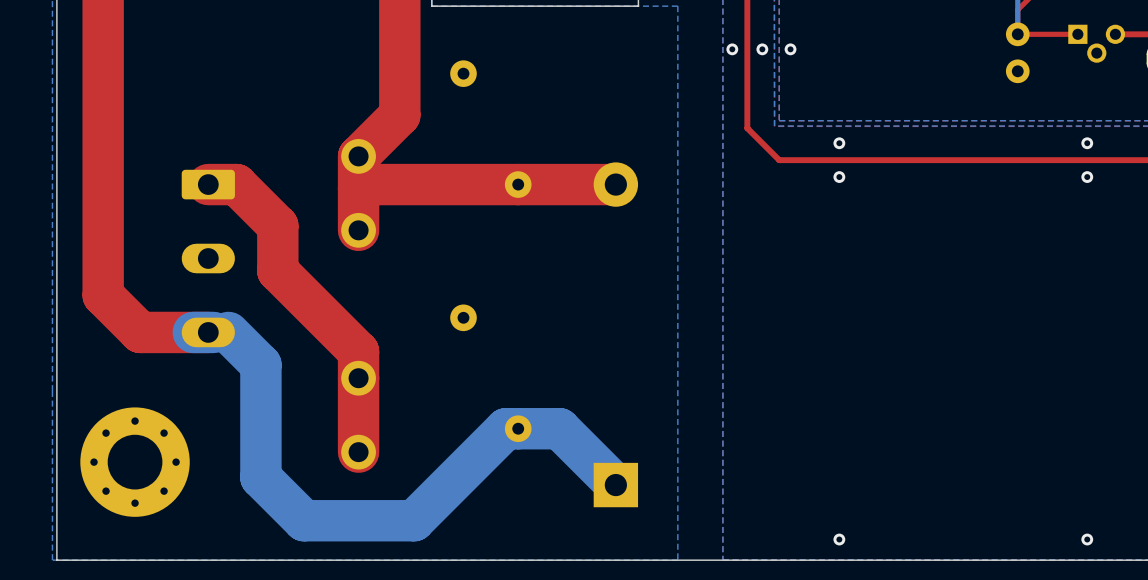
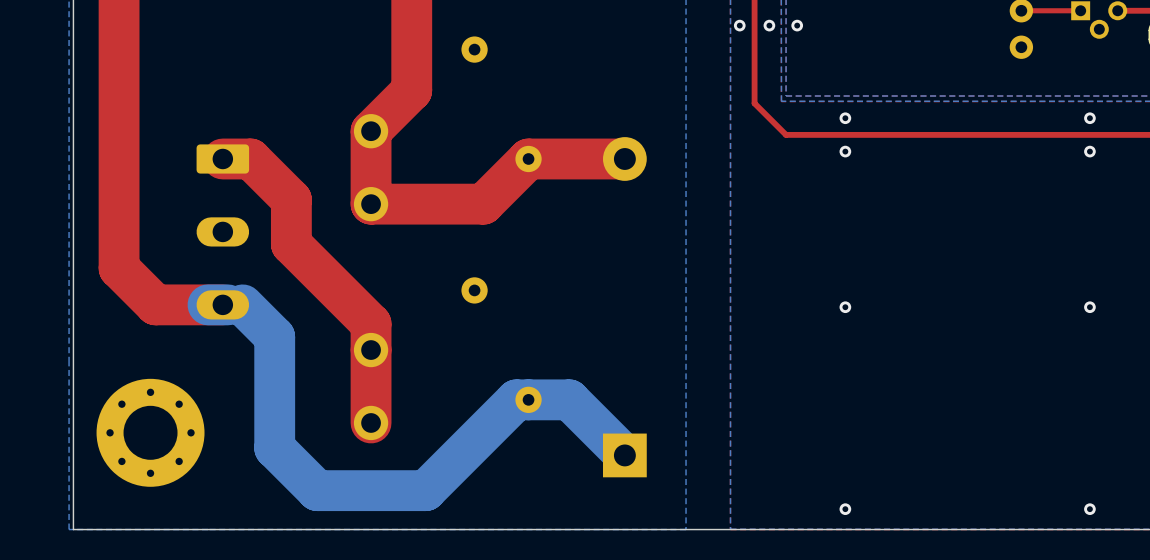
top track: (518, 184) (362, 184) (358, 188) -> (528, 158) (483, 204) (371, 204)
via: none -> (845, 307)
via: none -> (1089, 307)

